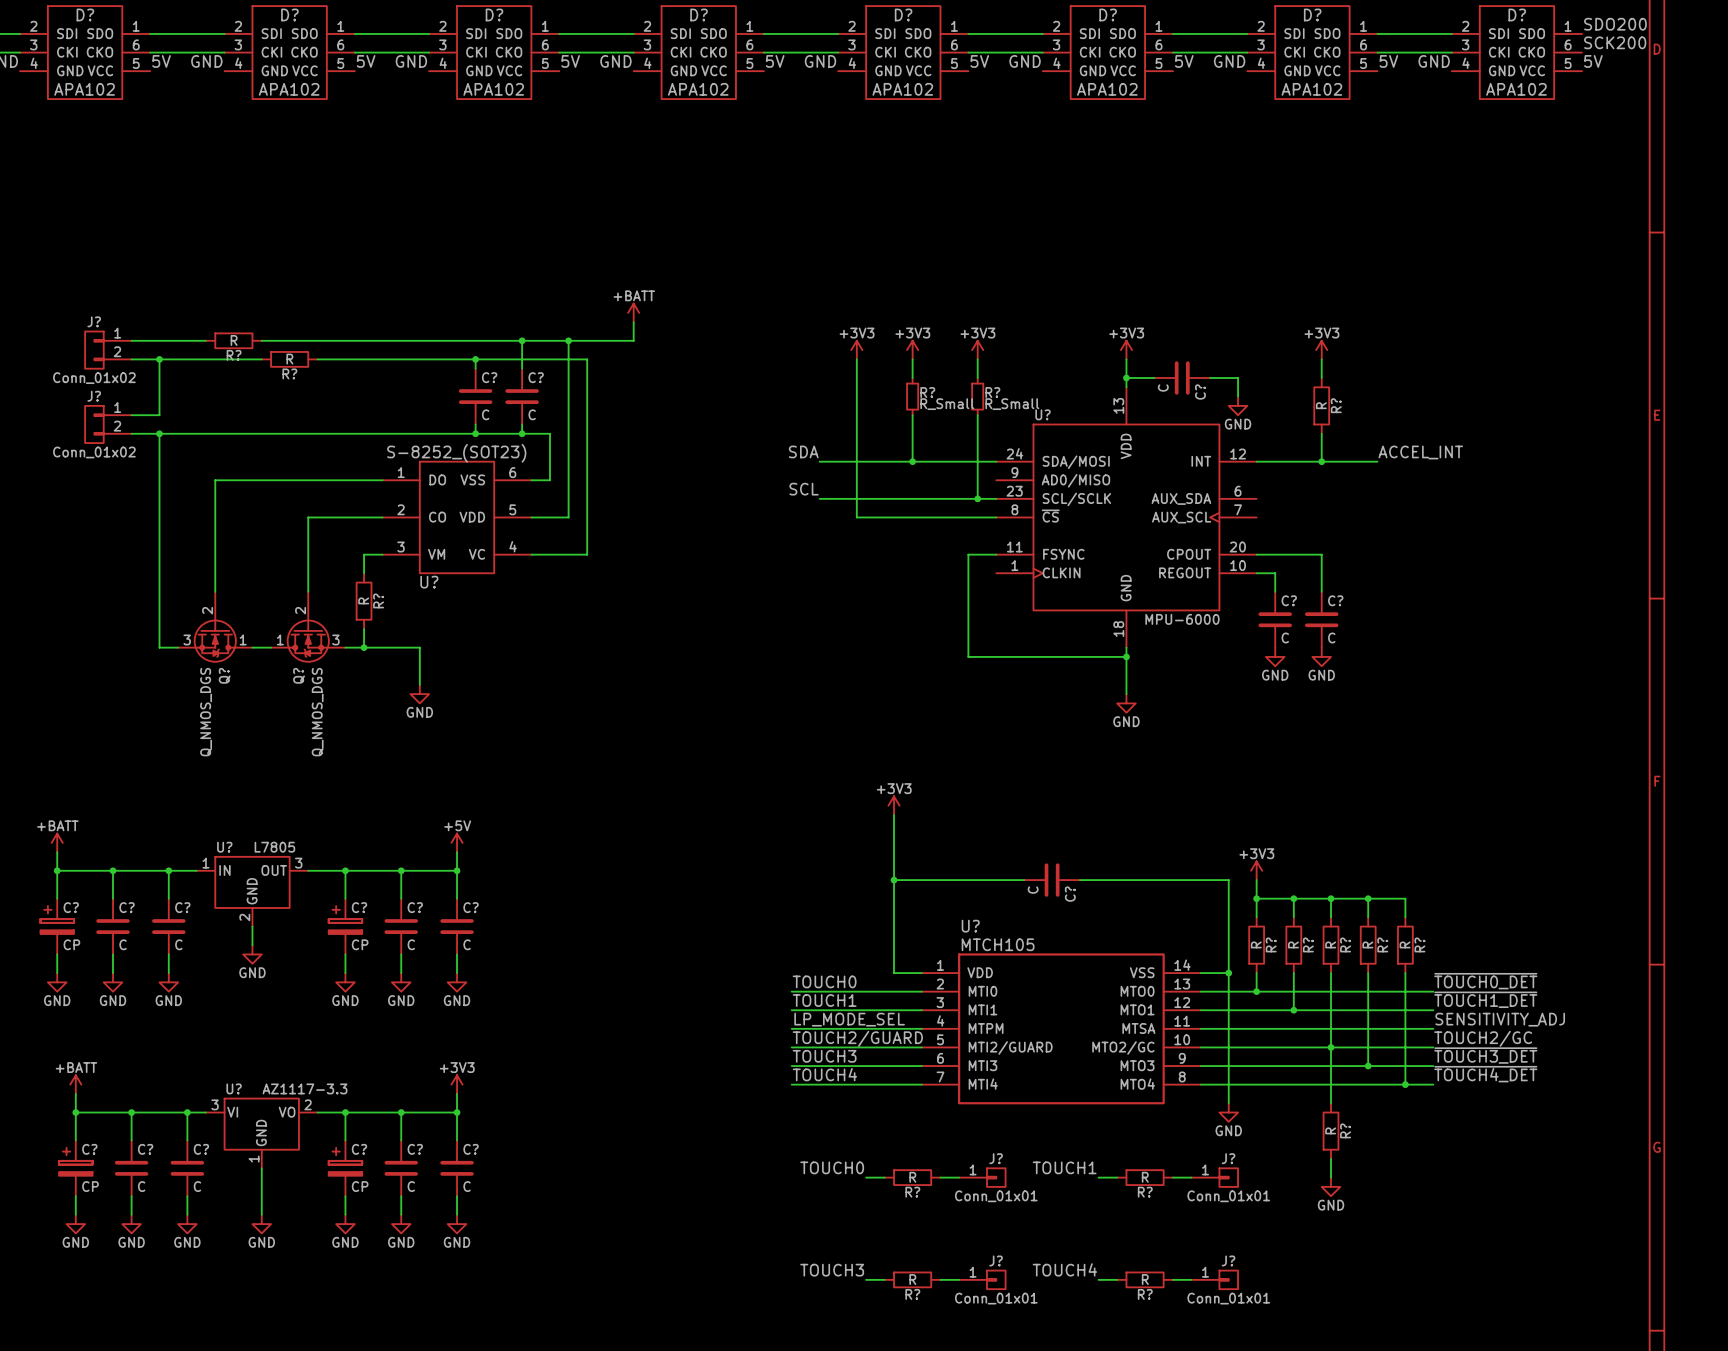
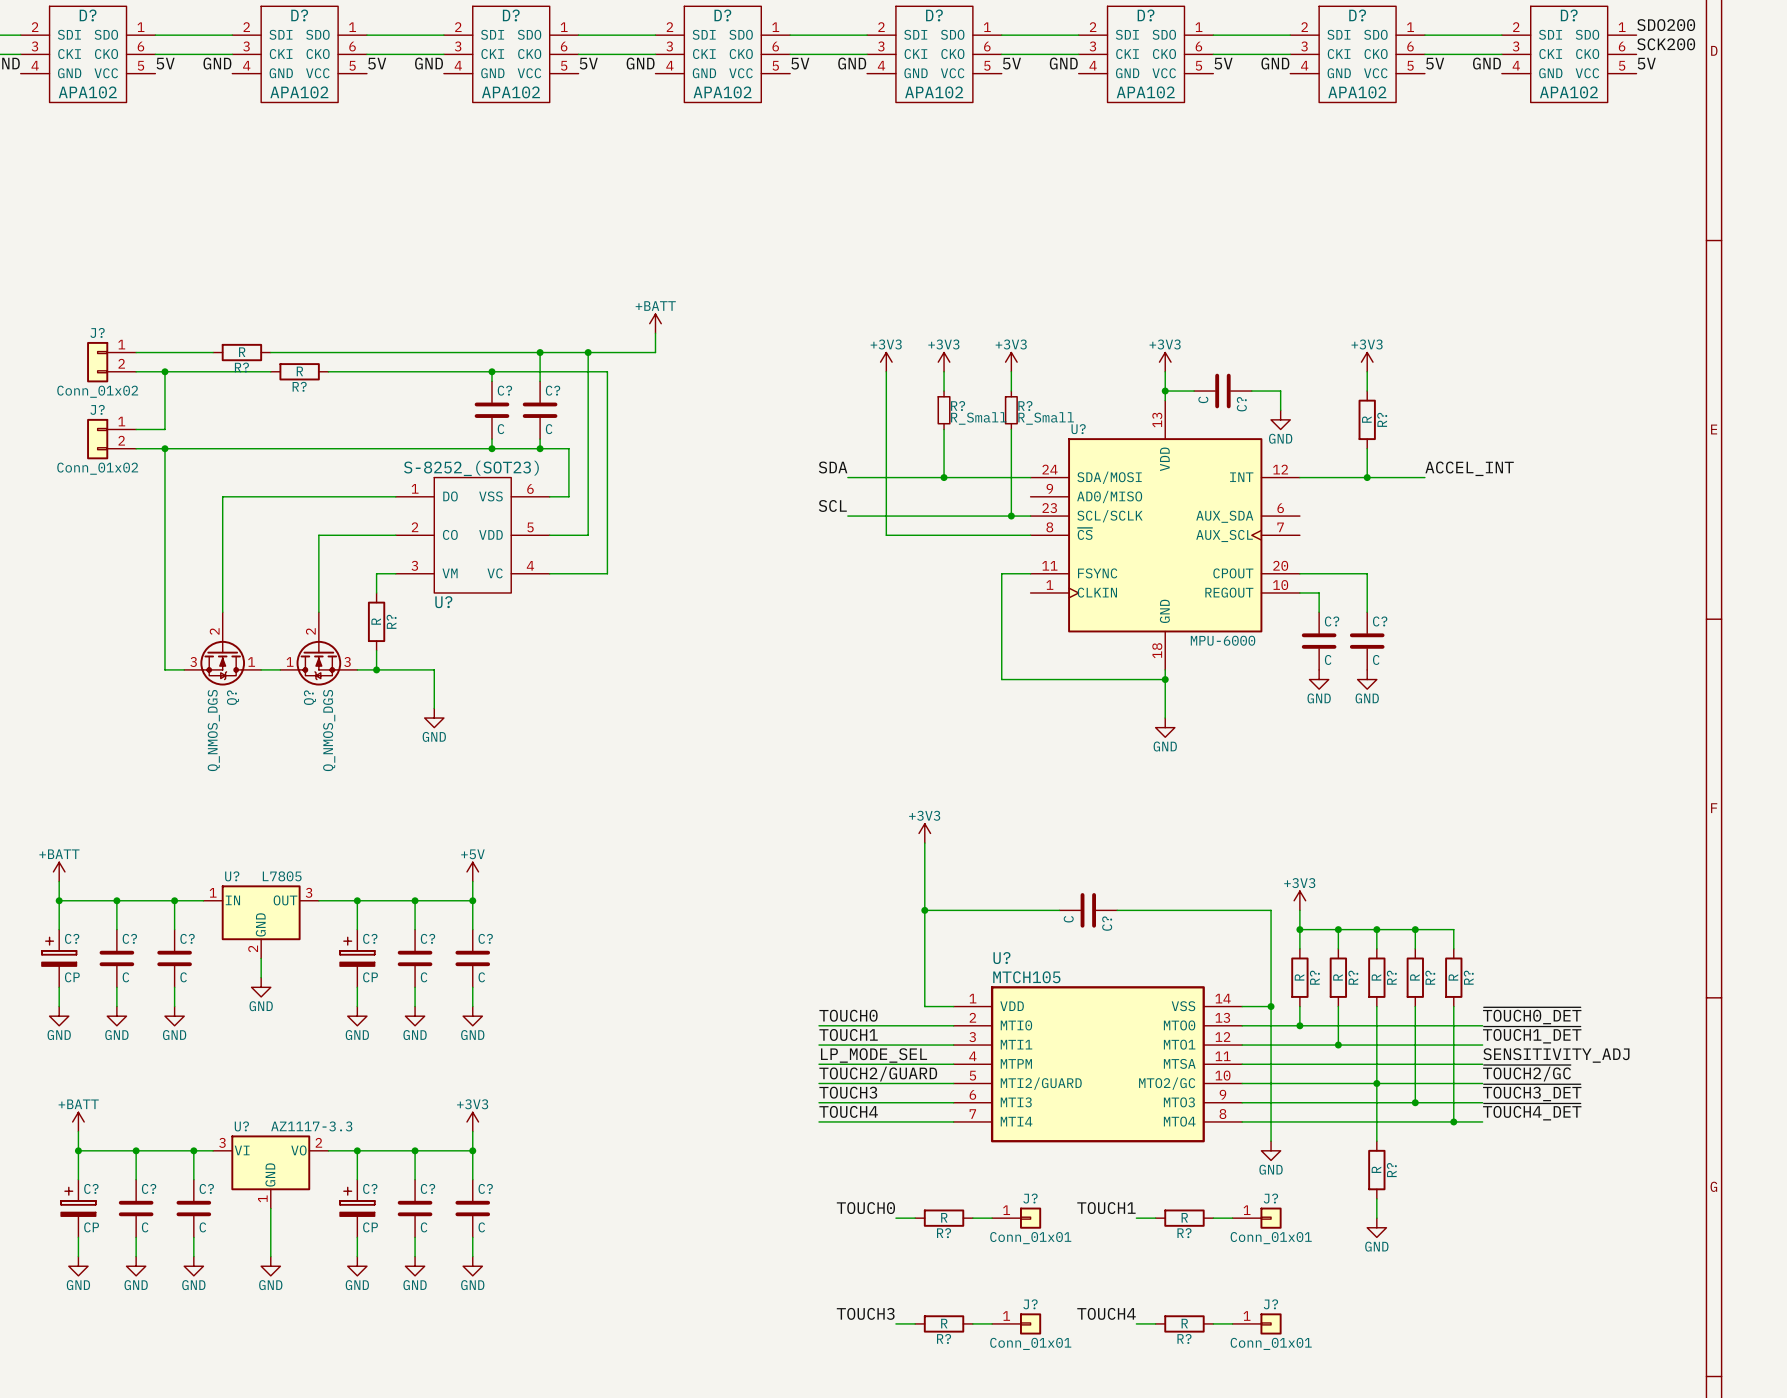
label: TOUCH2/GC (1483, 1038) -> ~{TOUCH2/GC} (1526, 1073)

